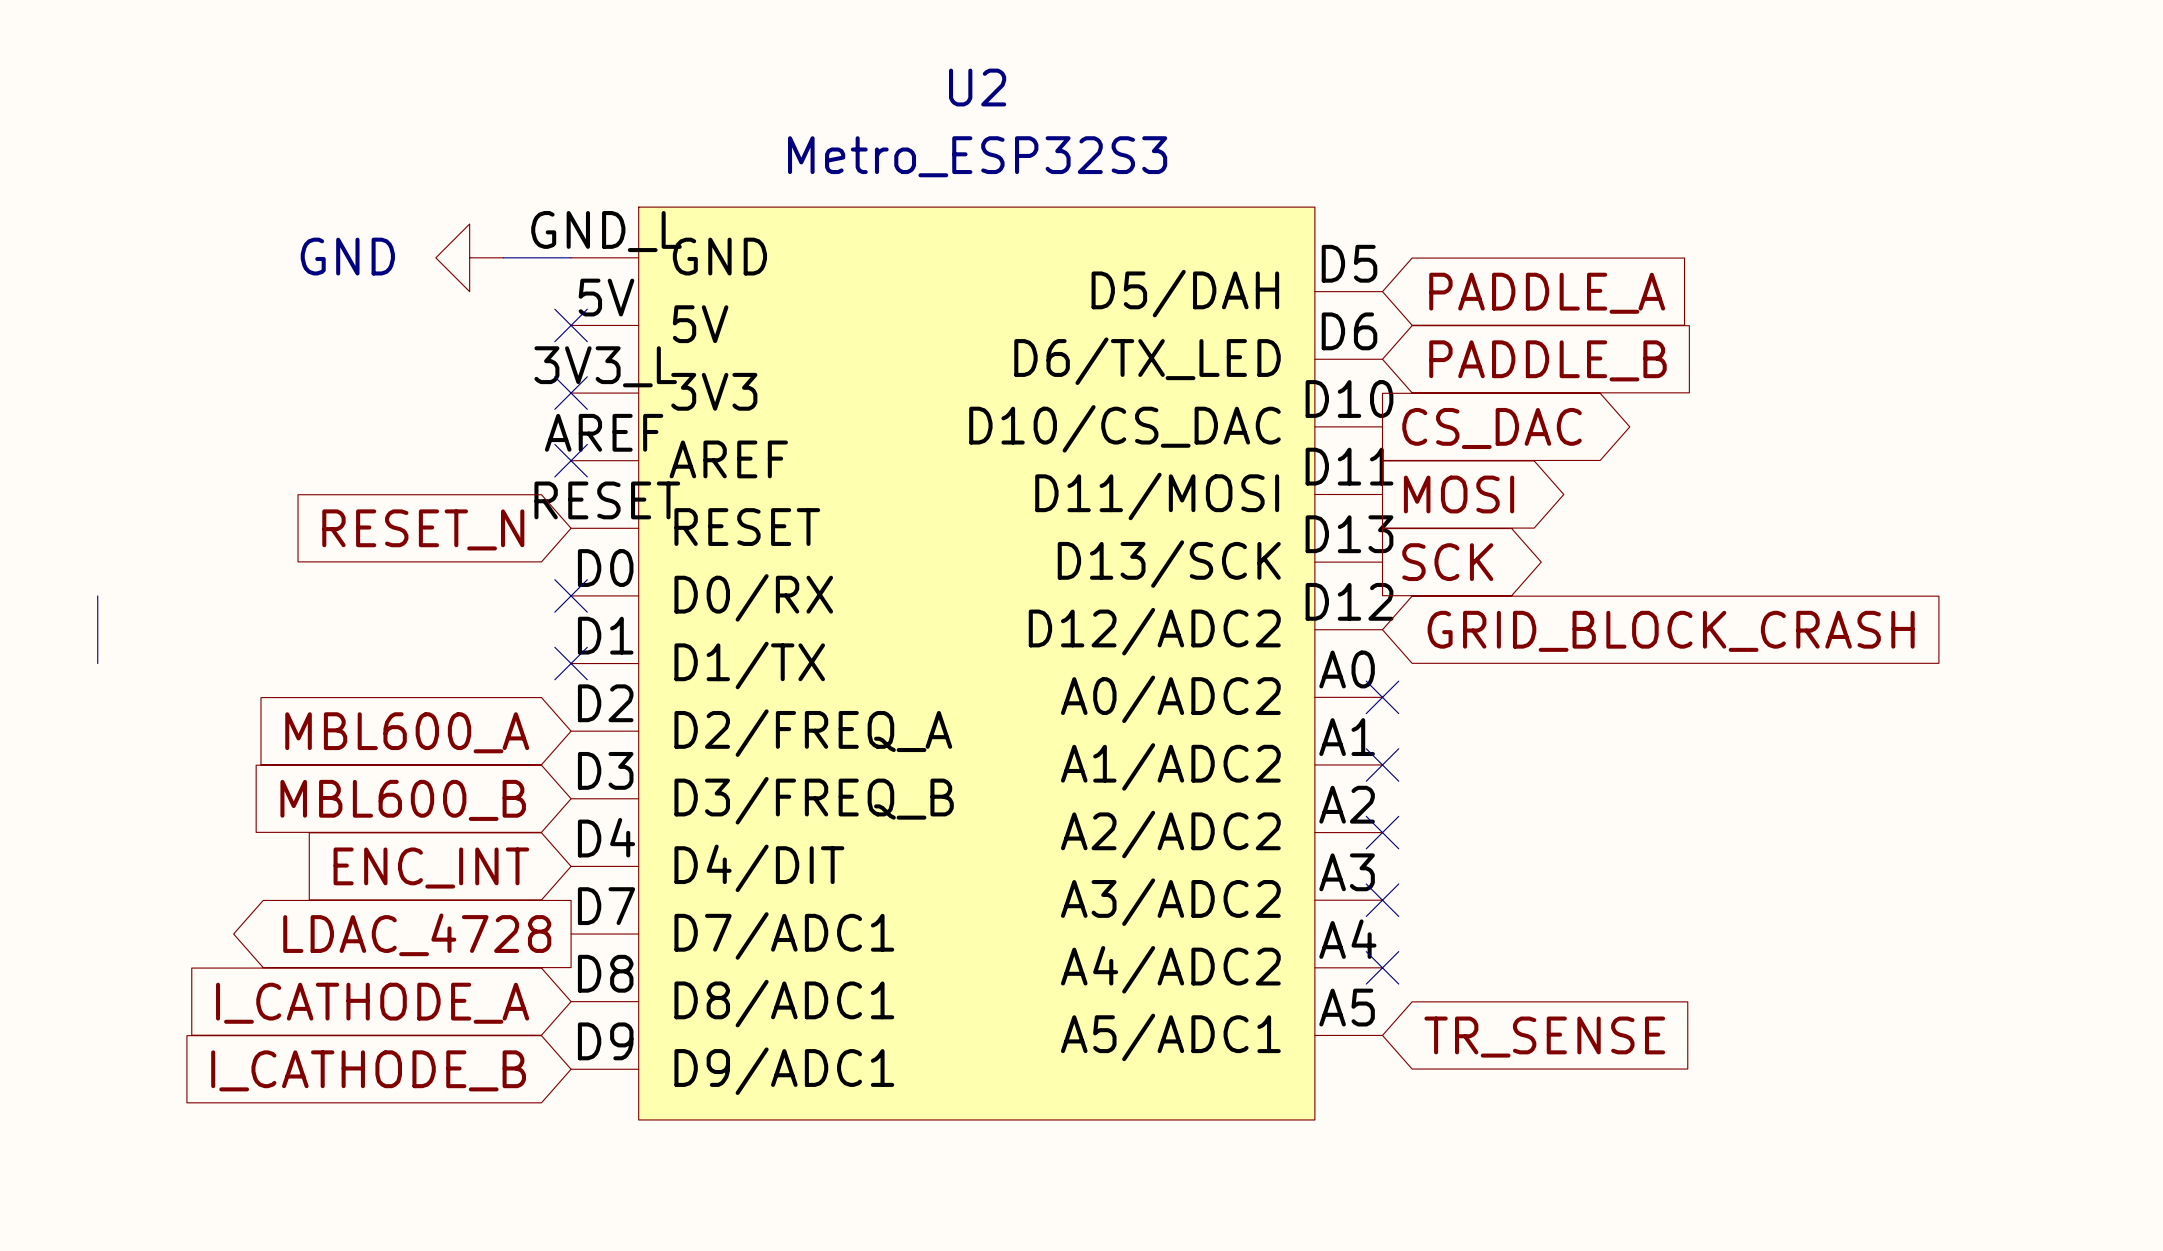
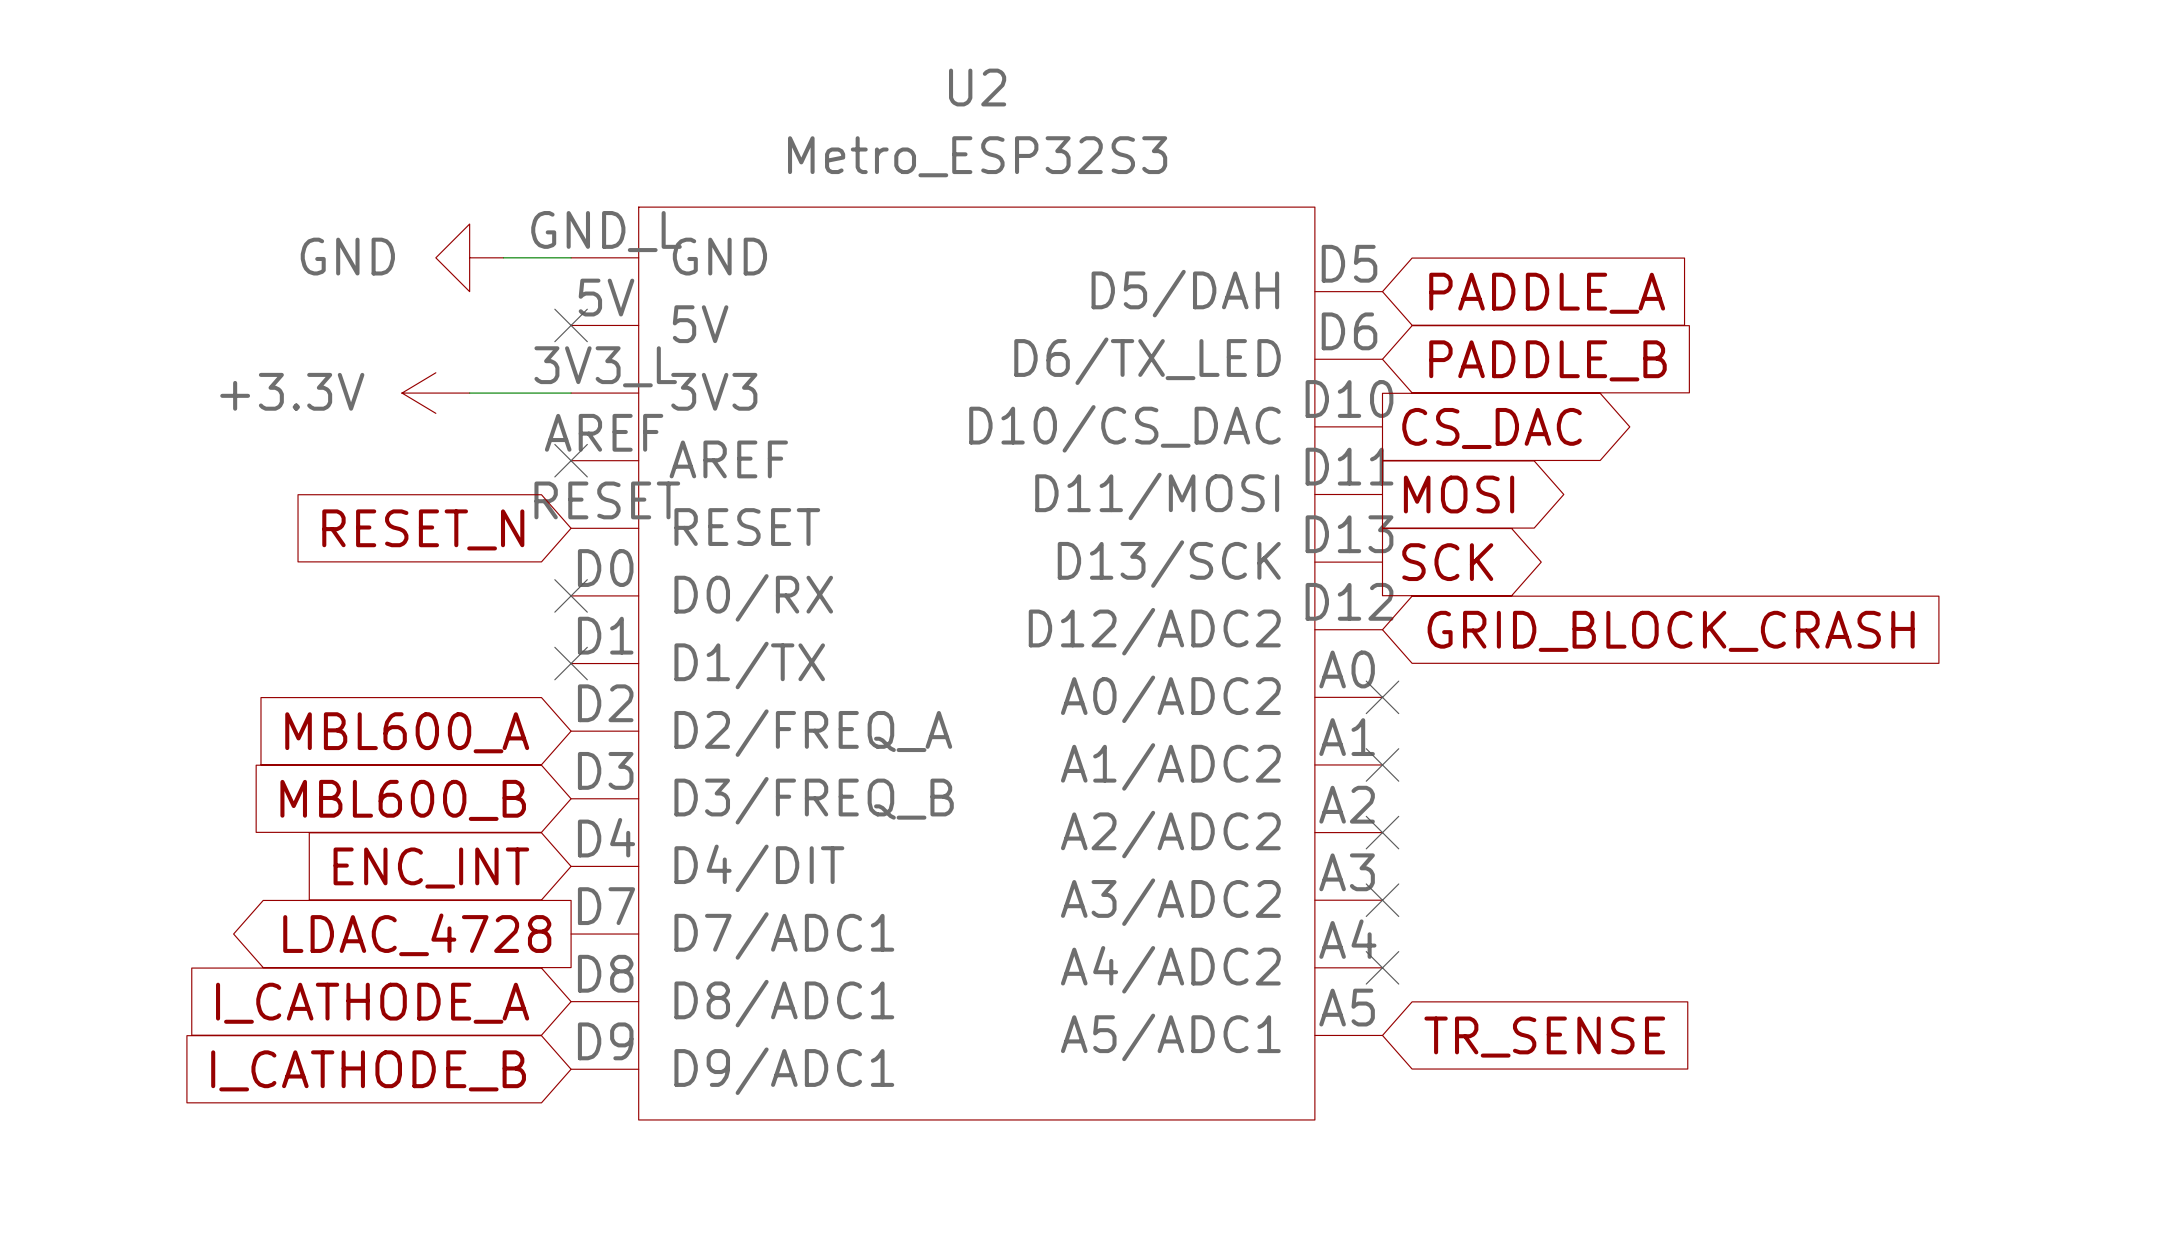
power symbol: none -> +3.3V (435, 393)
wire: none -> (469, 393) (571, 393)
no-connect mark: (571, 393) -> none
wire: (97, 595) (97, 663) -> none

